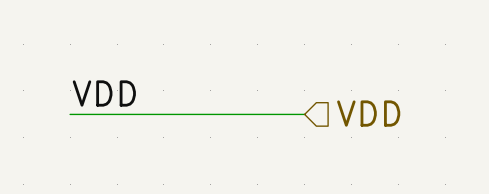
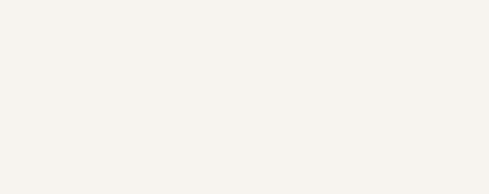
label: VDD (104, 93) -> none
hierarchical label: VDD (368, 113) -> none
wire: (70, 114) (304, 114) -> none

